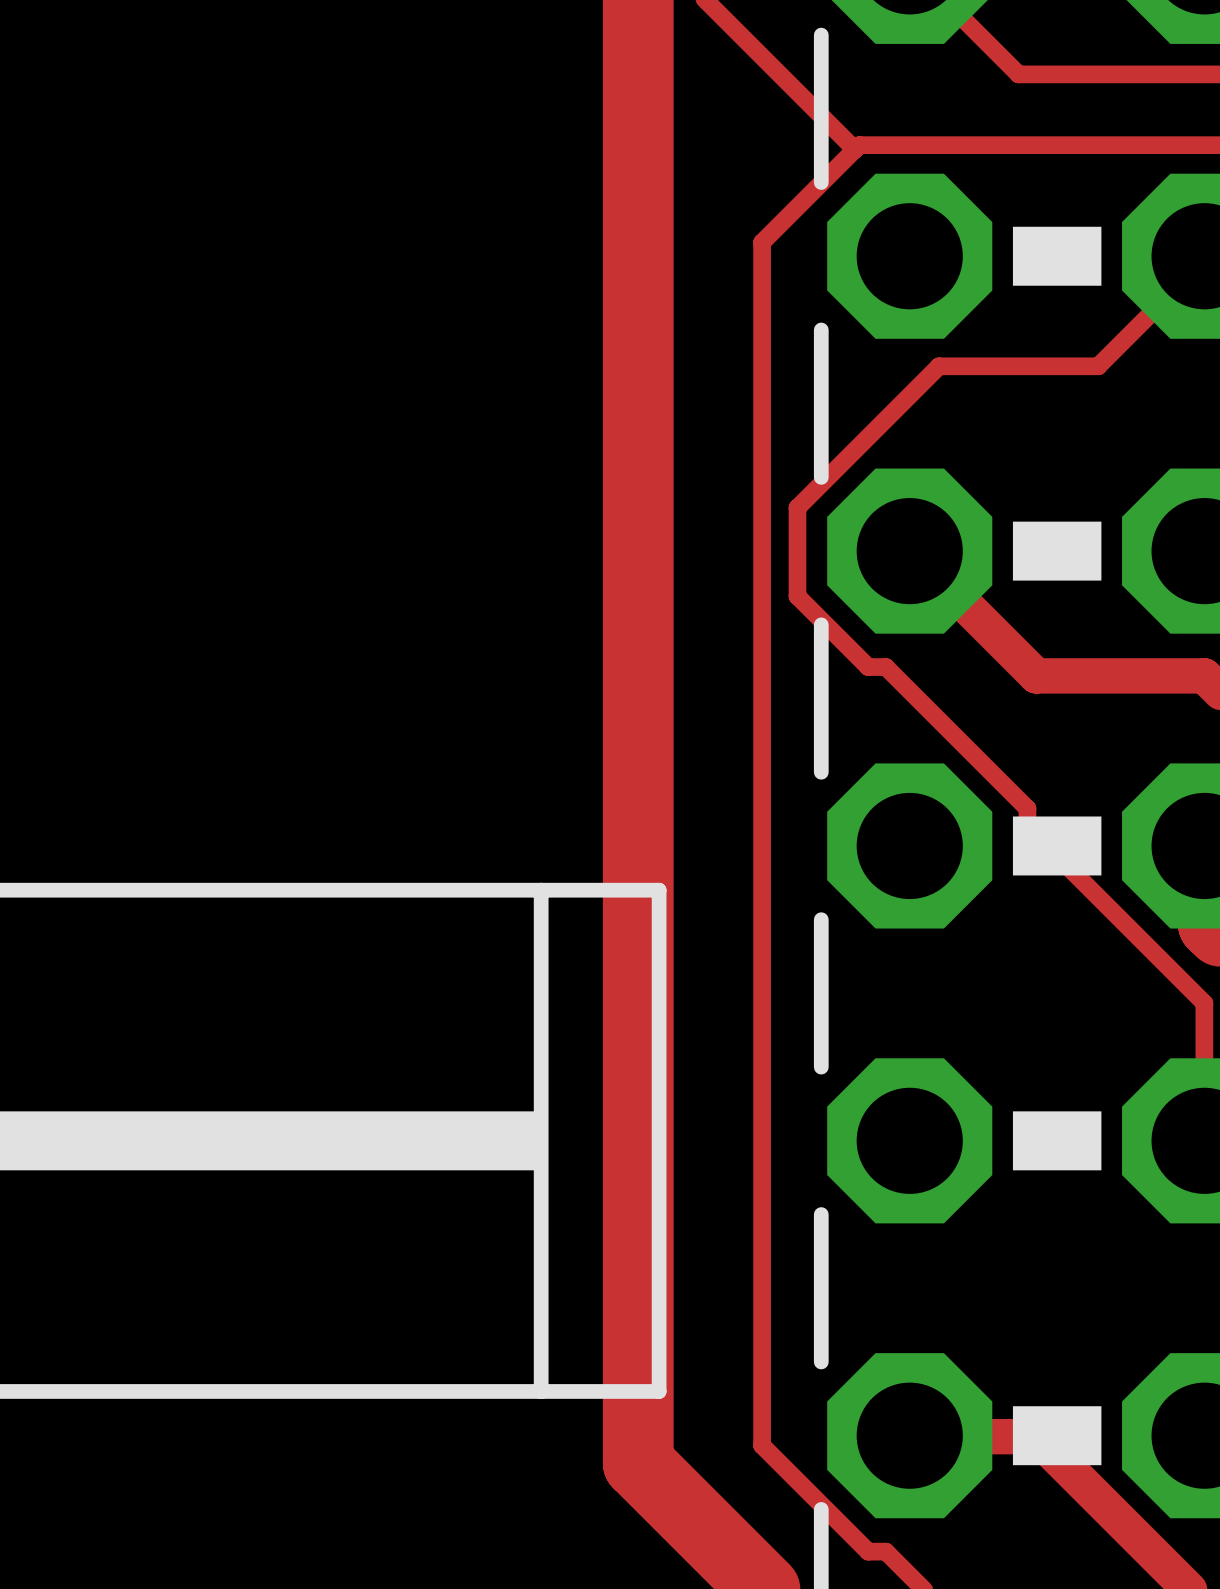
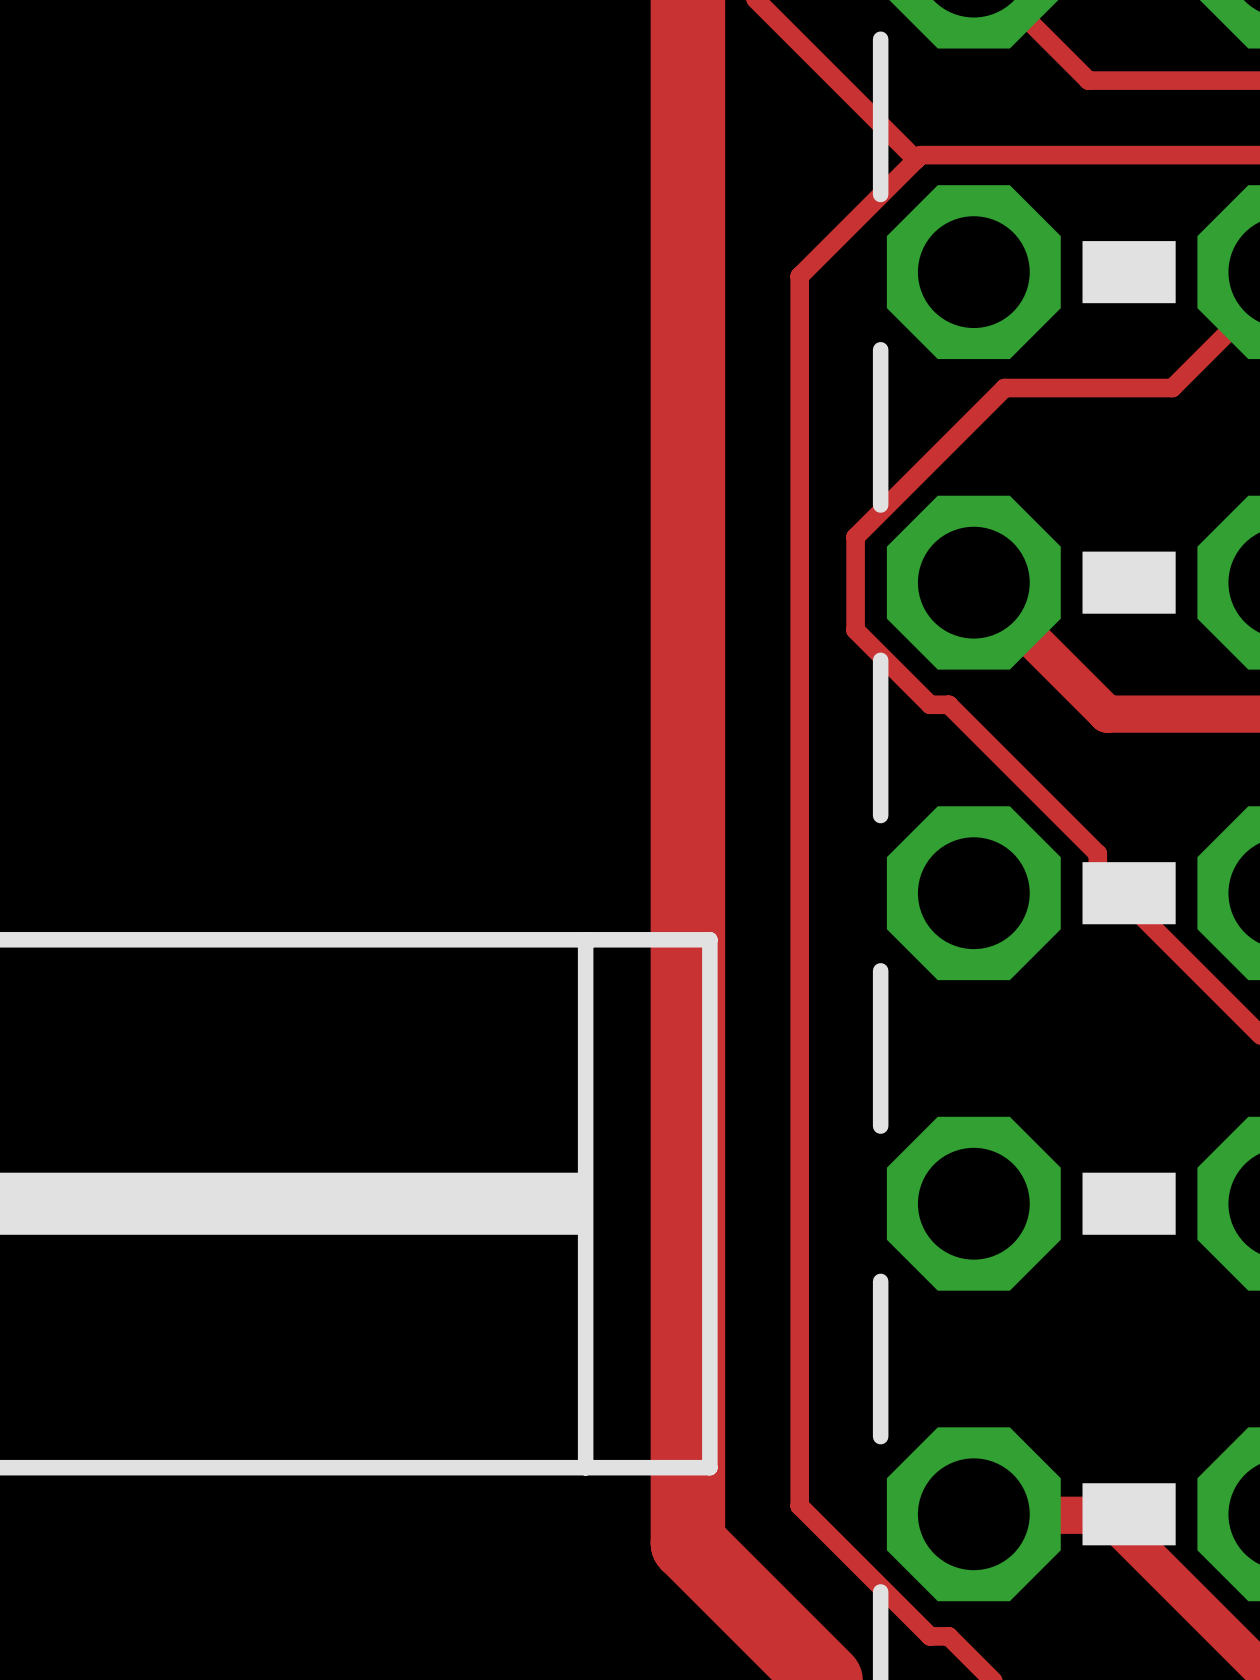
track: (762, 242) (762, 1445) -> (818, 257) (799, 276) (799, 1505) (818, 1524)

